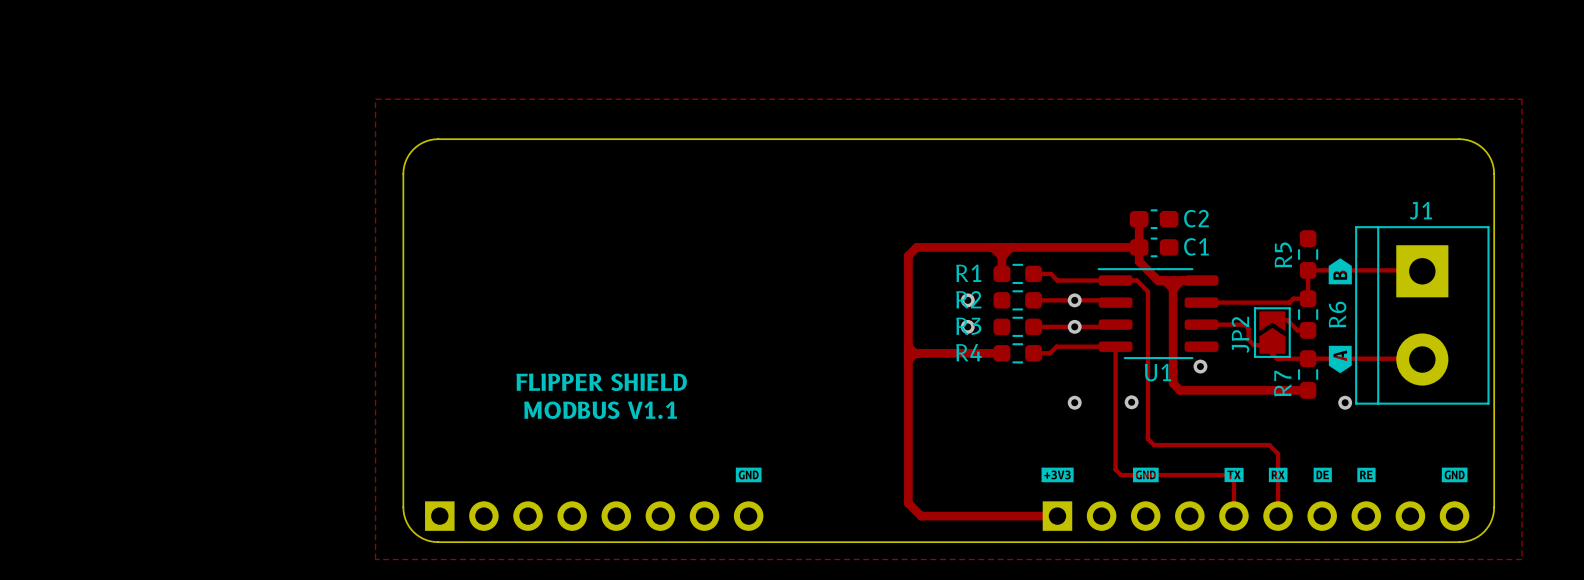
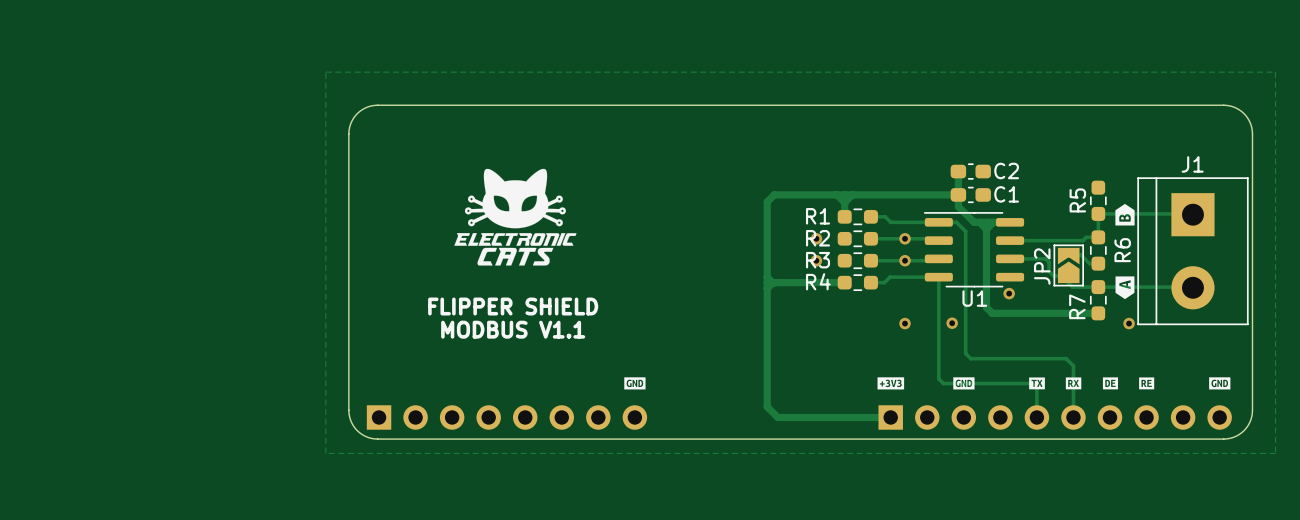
drawing: none -> [454, 168, 577, 266]

